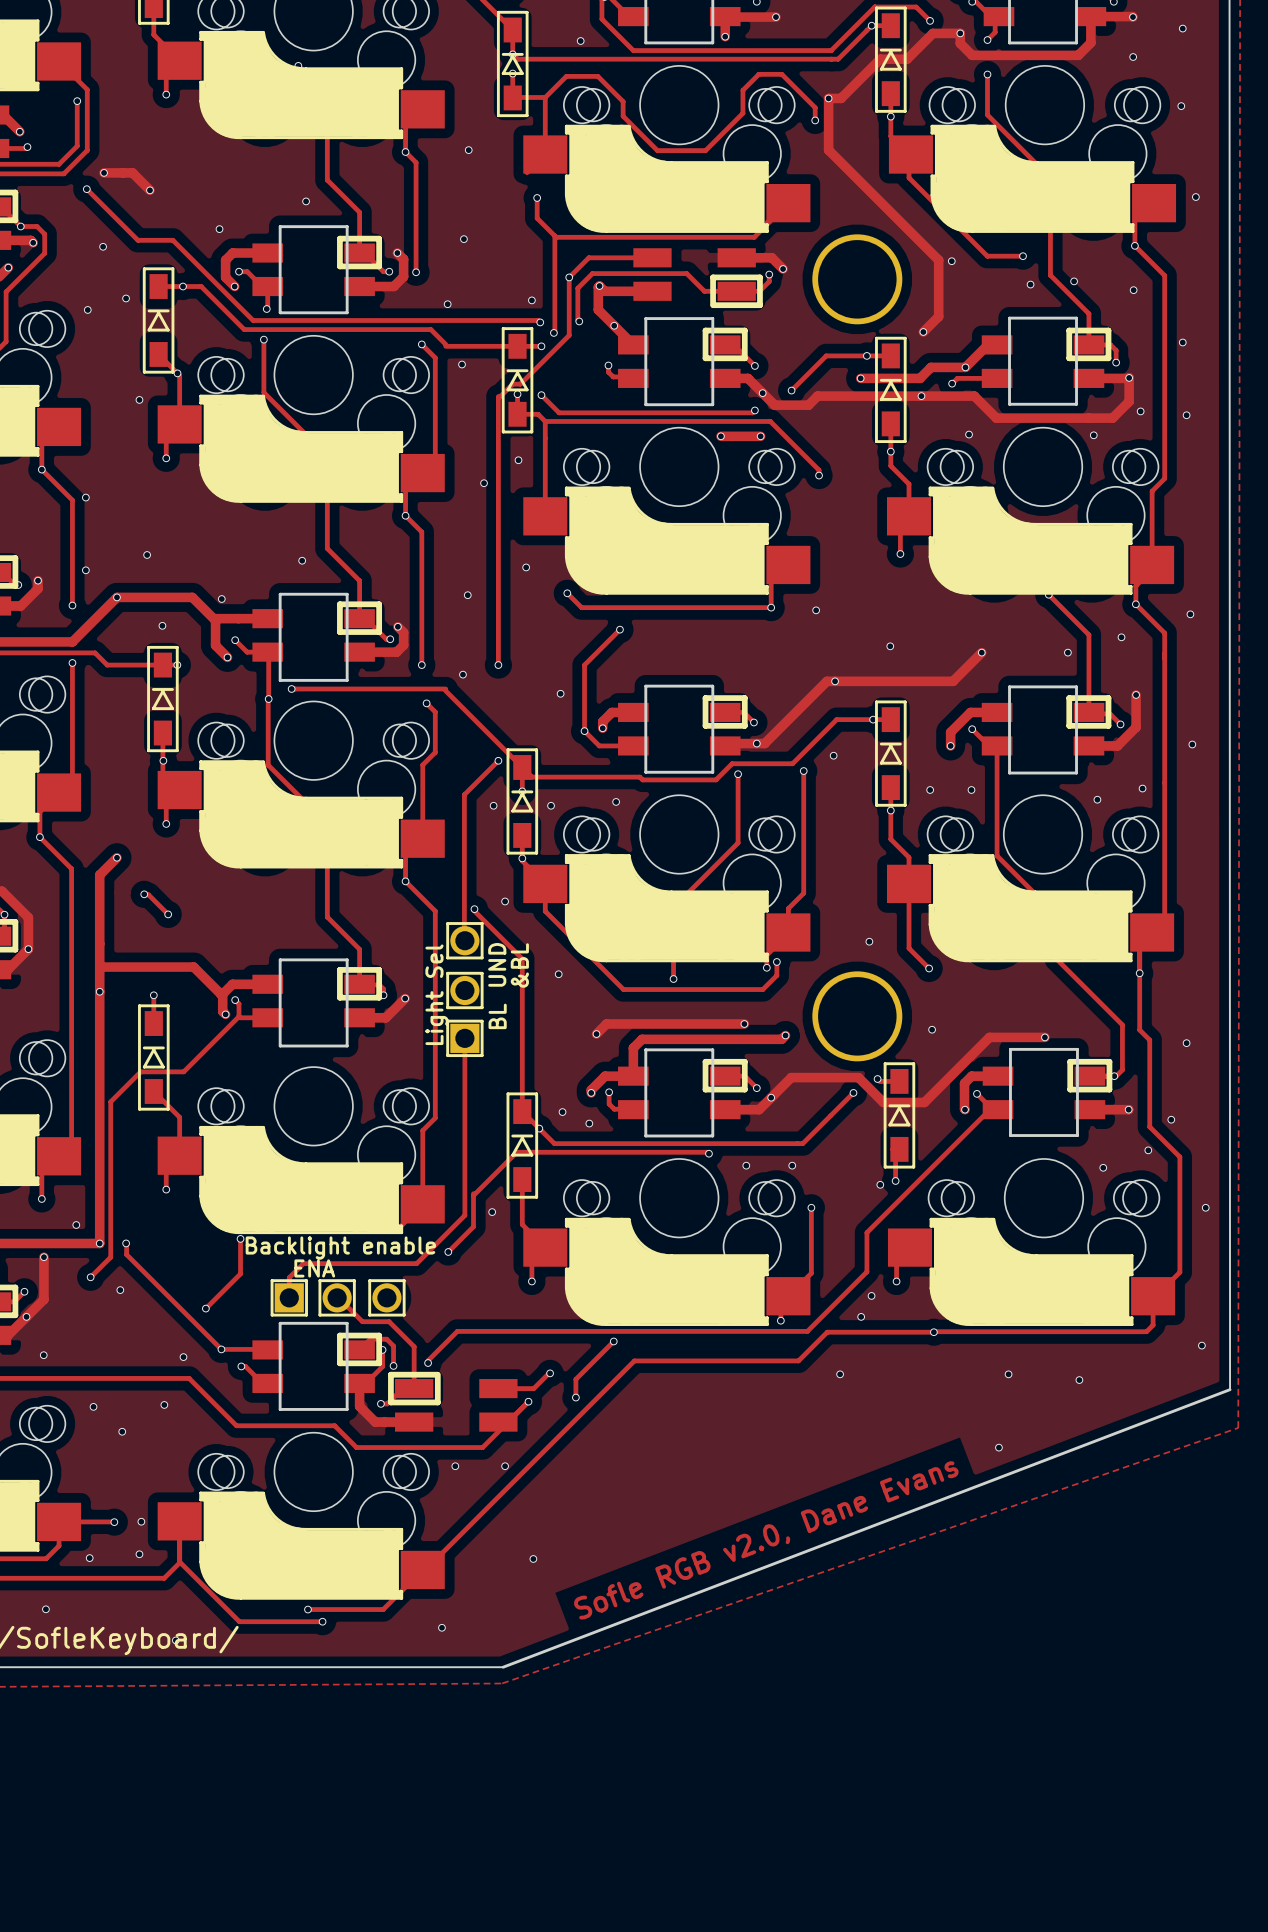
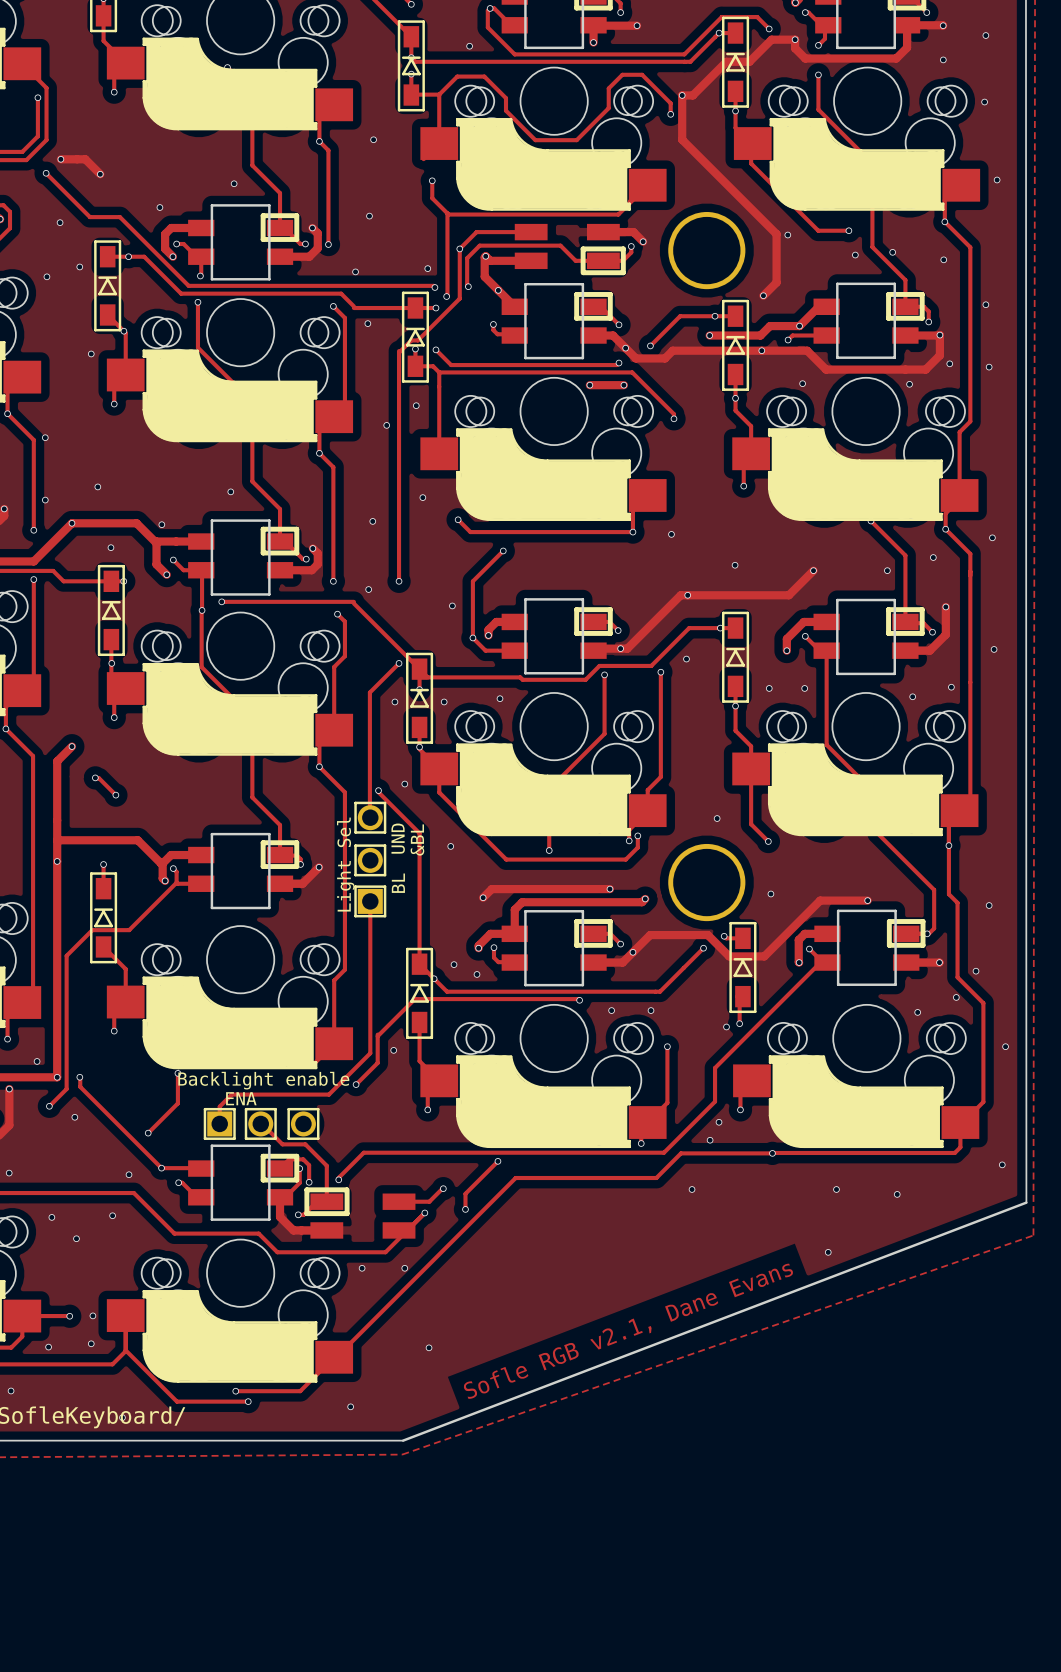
text: Sofle RGB v2.0, Dane Evans (766, 1540) -> Sofle RGB v2.1, Dane Evans (628, 1331)

